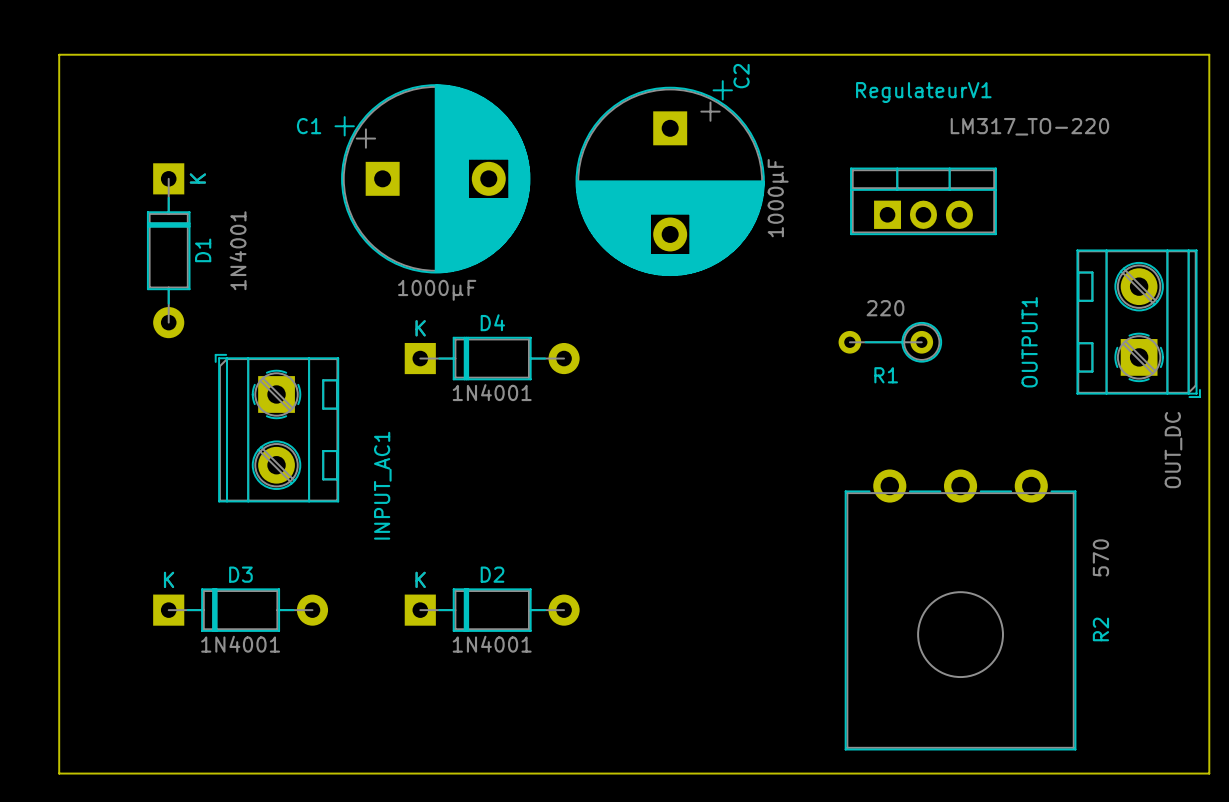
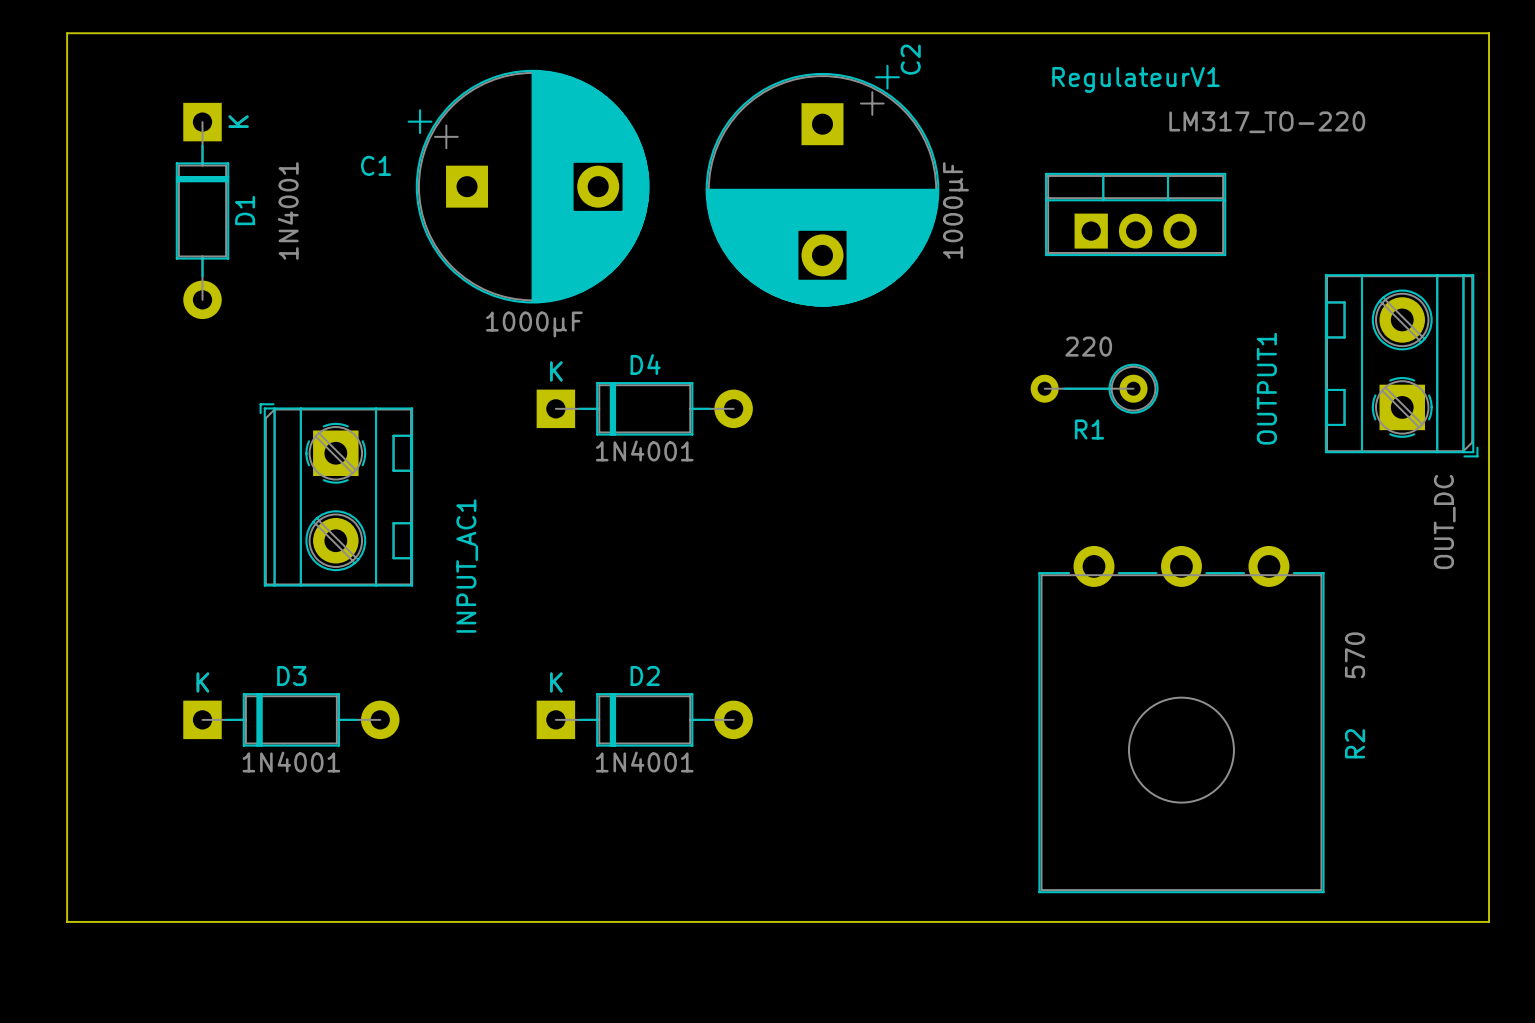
C1 name position: C1 (309, 126) -> C1 (376, 165)
D1 position: (168, 250) -> (202, 210)
D4 position: (492, 358) -> (644, 408)
D2 position: (492, 610) -> (644, 719)

